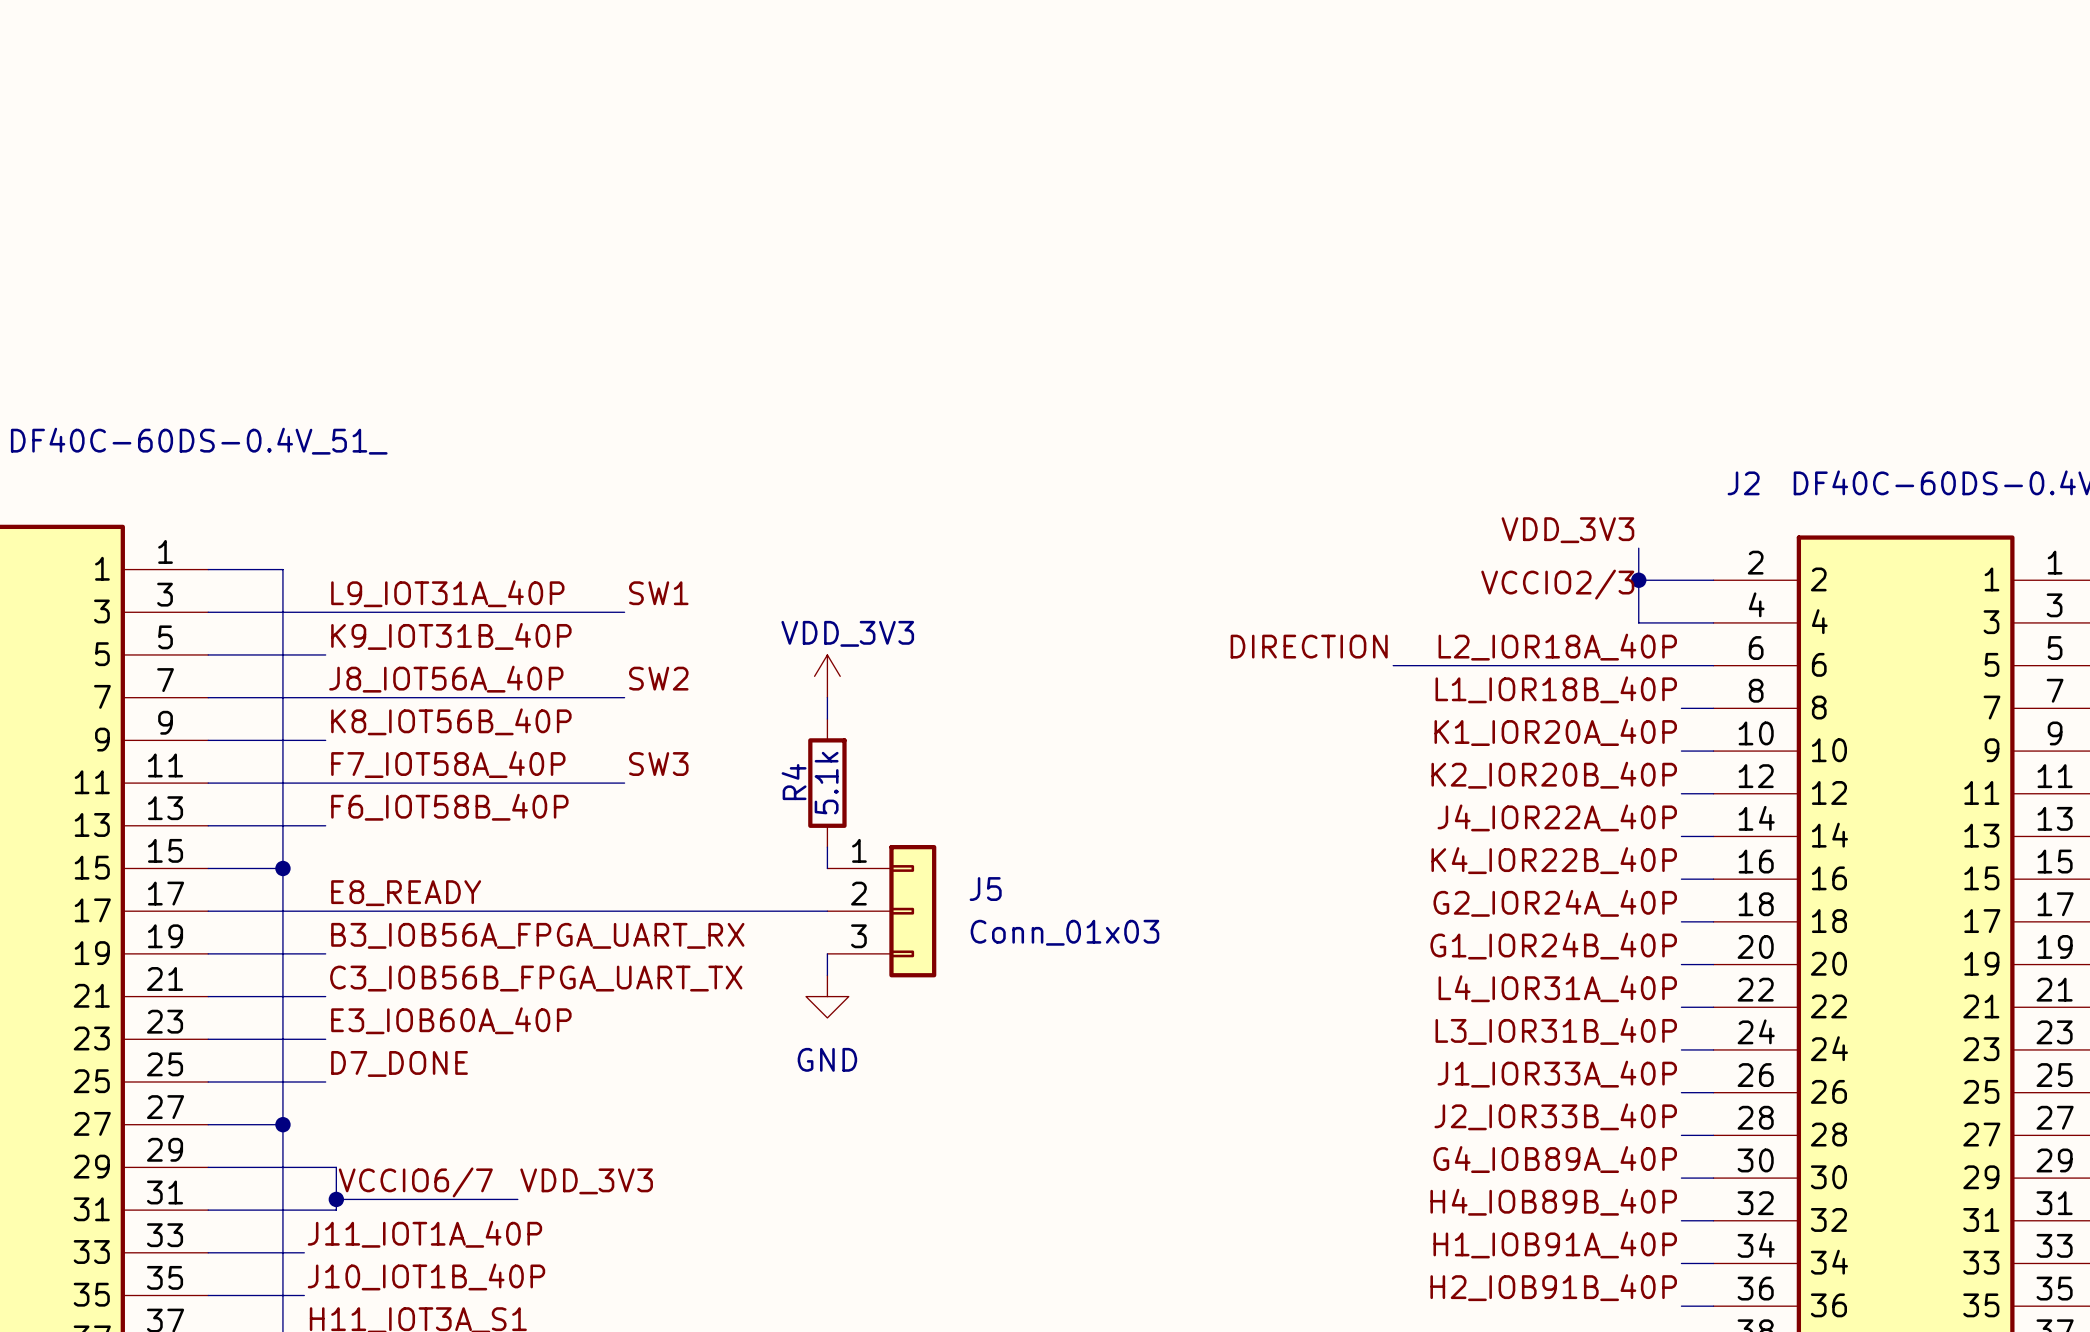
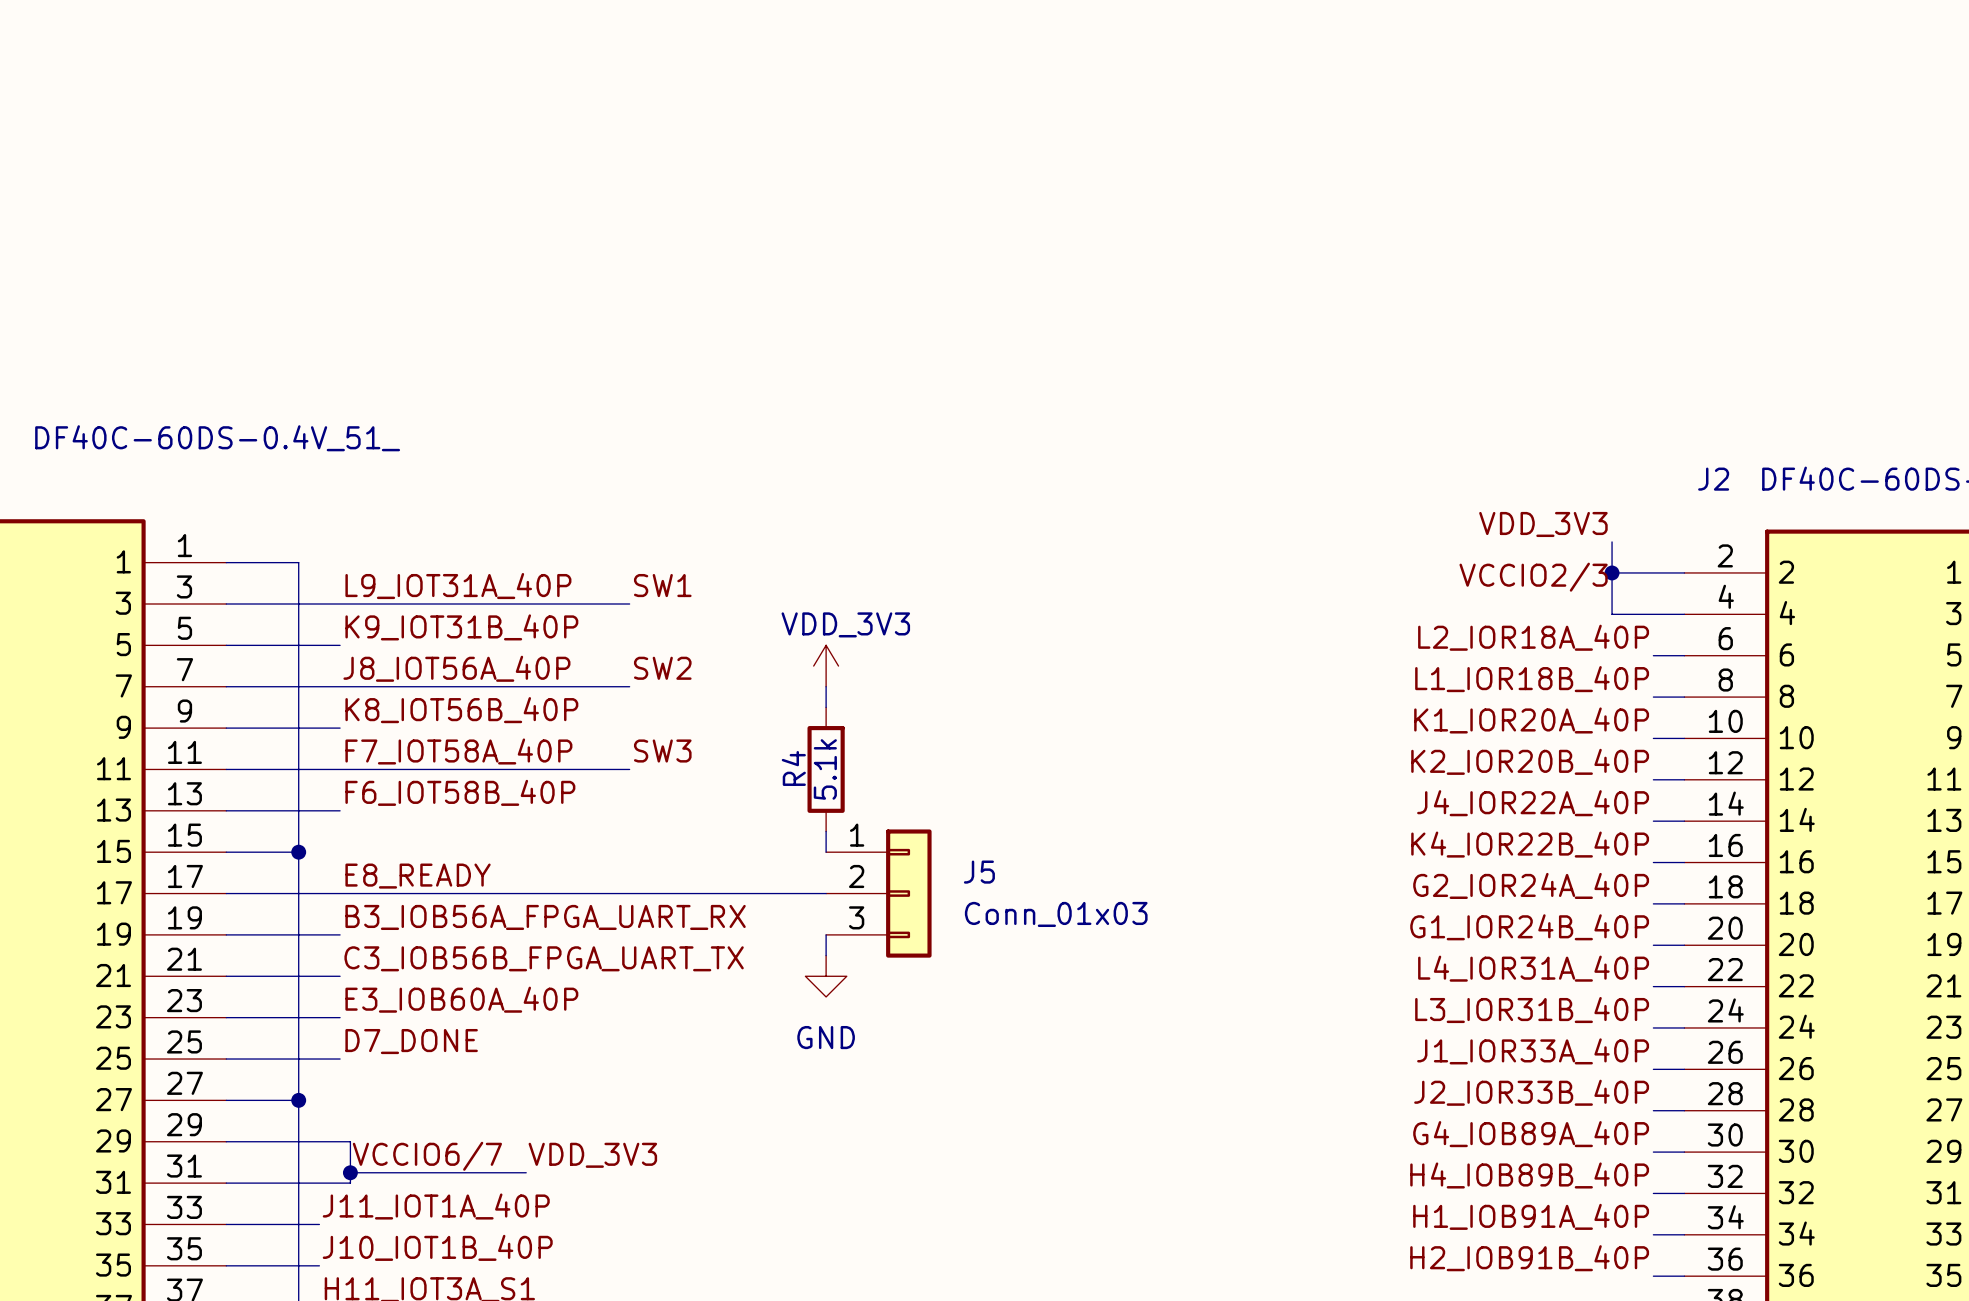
label: DIRECTION (1309, 646) -> none
wire: (1393, 665) (1681, 665) -> none

